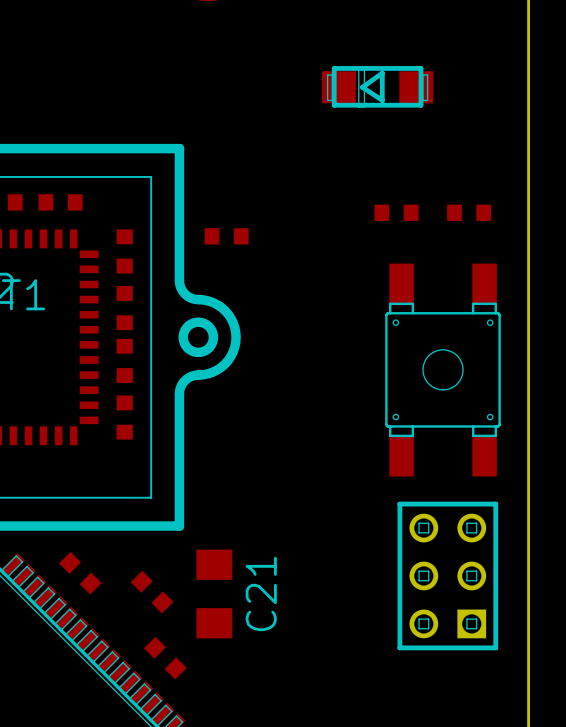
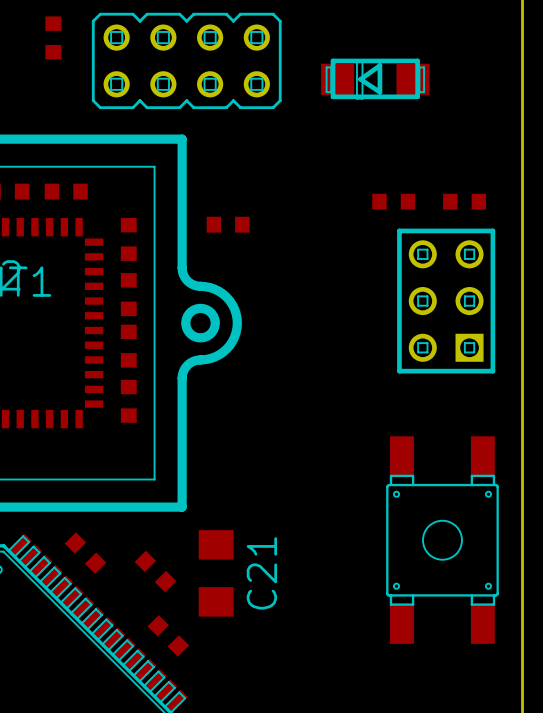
part: none -> (53, 37)
part: none -> (186, 60)
part: none -> (446, 301)
part: (443, 370) -> none
part footprint: [397, 501, 499, 651] -> [386, 436, 499, 644]

